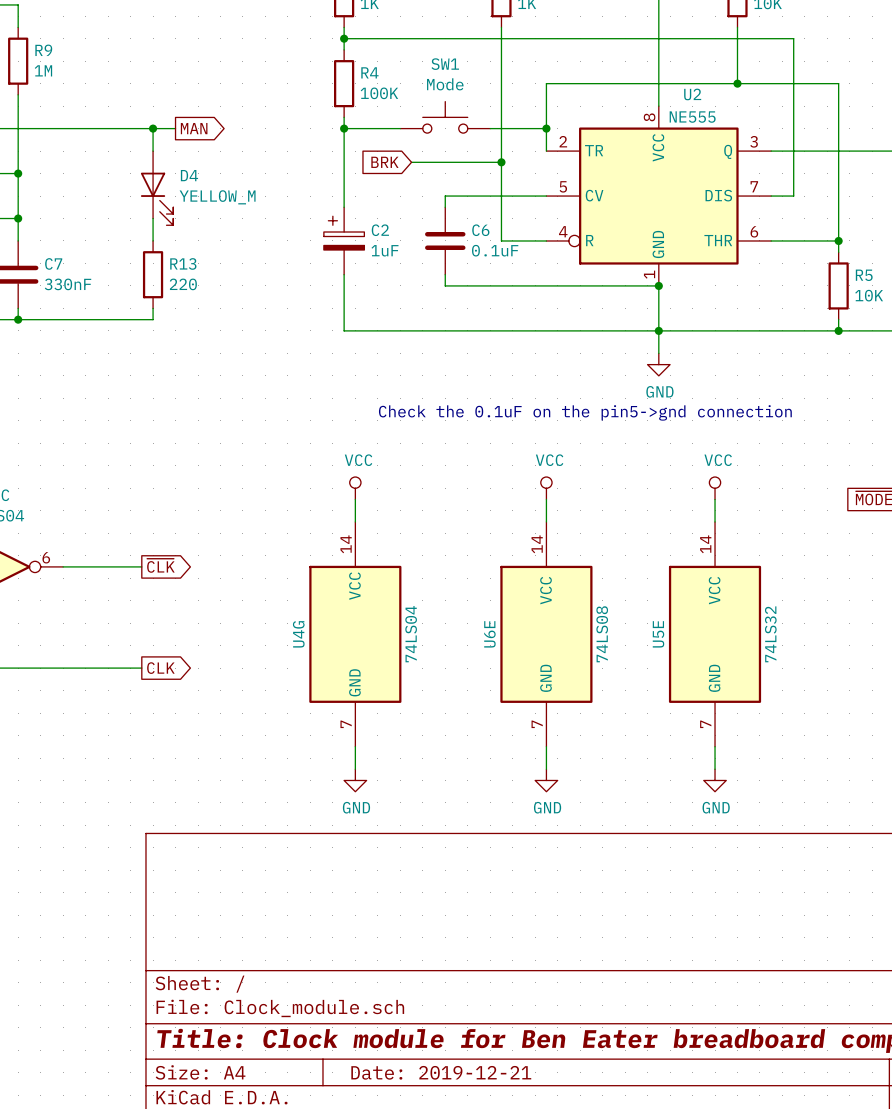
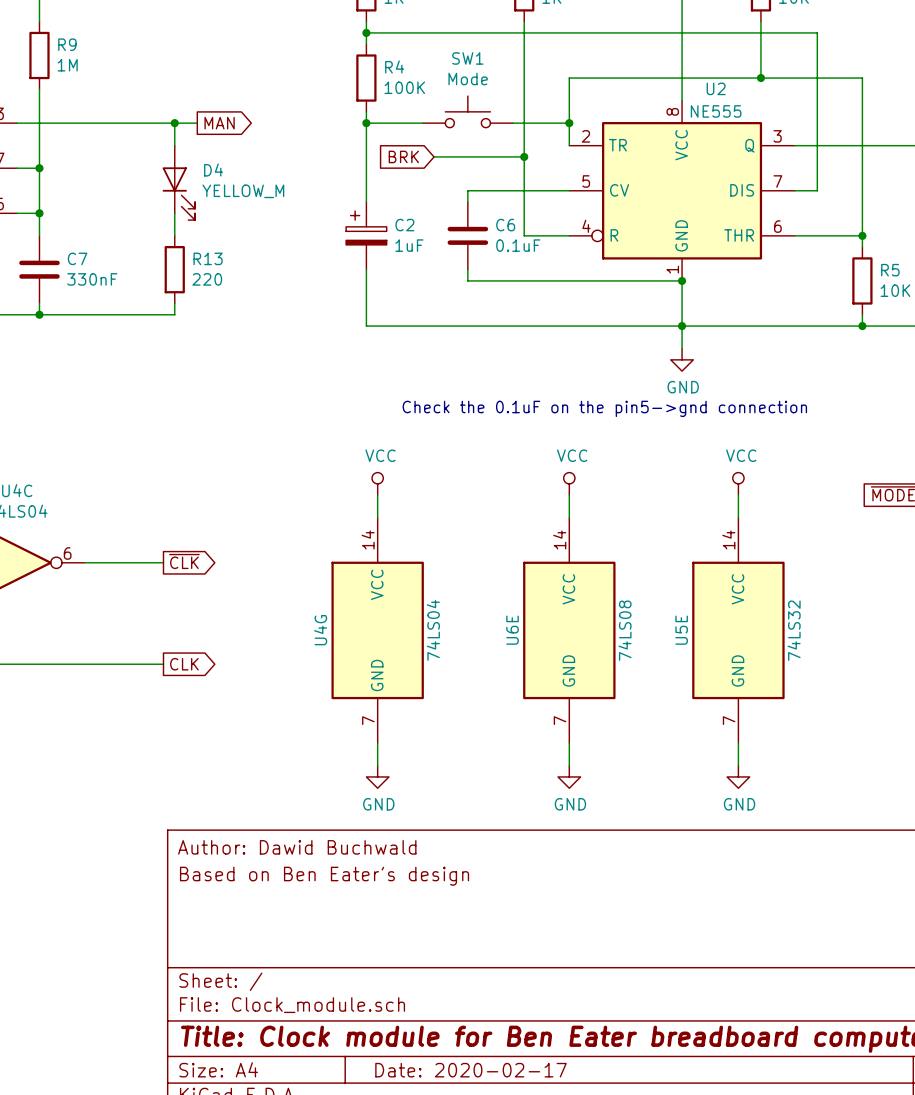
title block: none -> Author: Dawid Buchwald (297, 847)
title block: none -> Based on Ben Eater's design (324, 876)
title block: Date: 2019-12-21 (441, 1072) -> Date: 2020-02-17 (470, 1070)

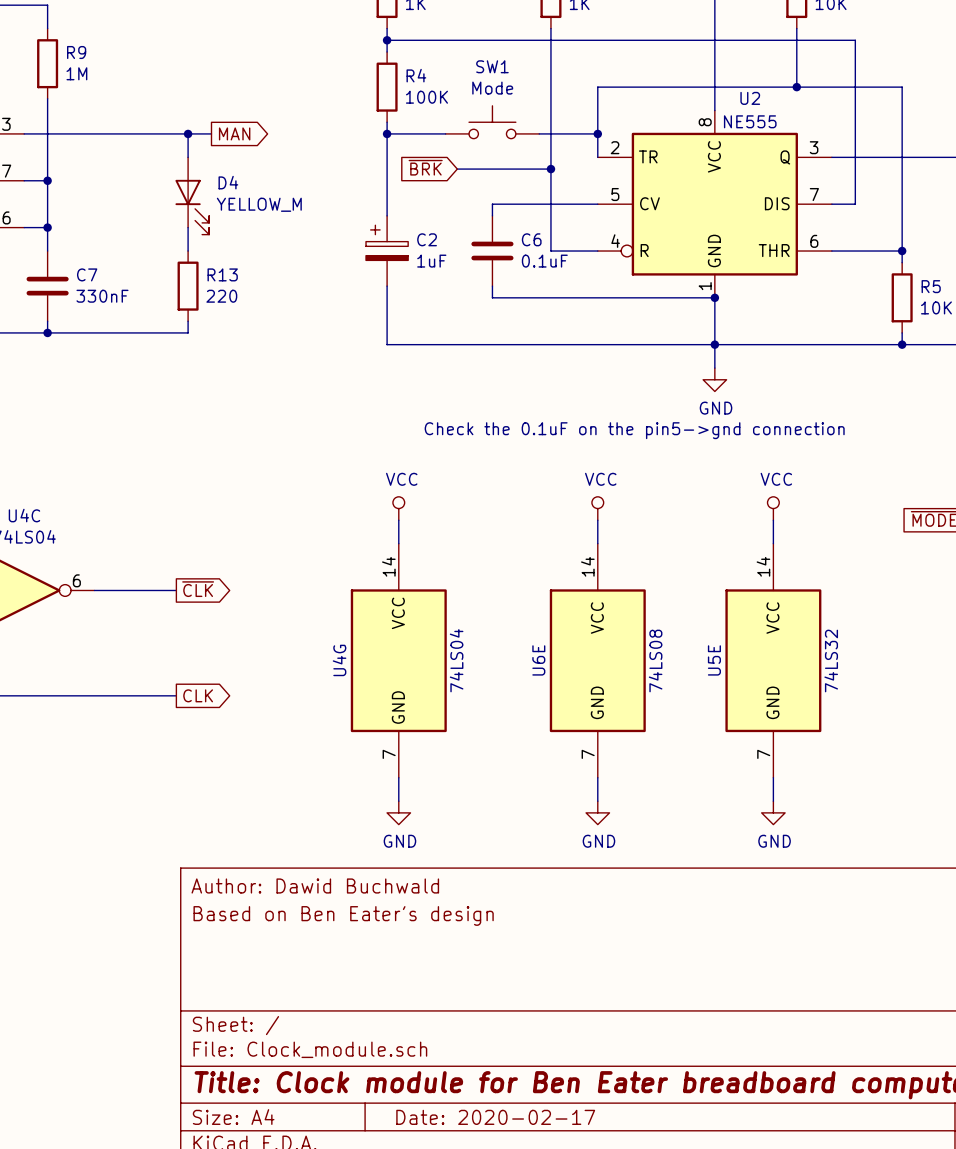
global label: BRK (403, 156) -> ~{BRK} (425, 167)

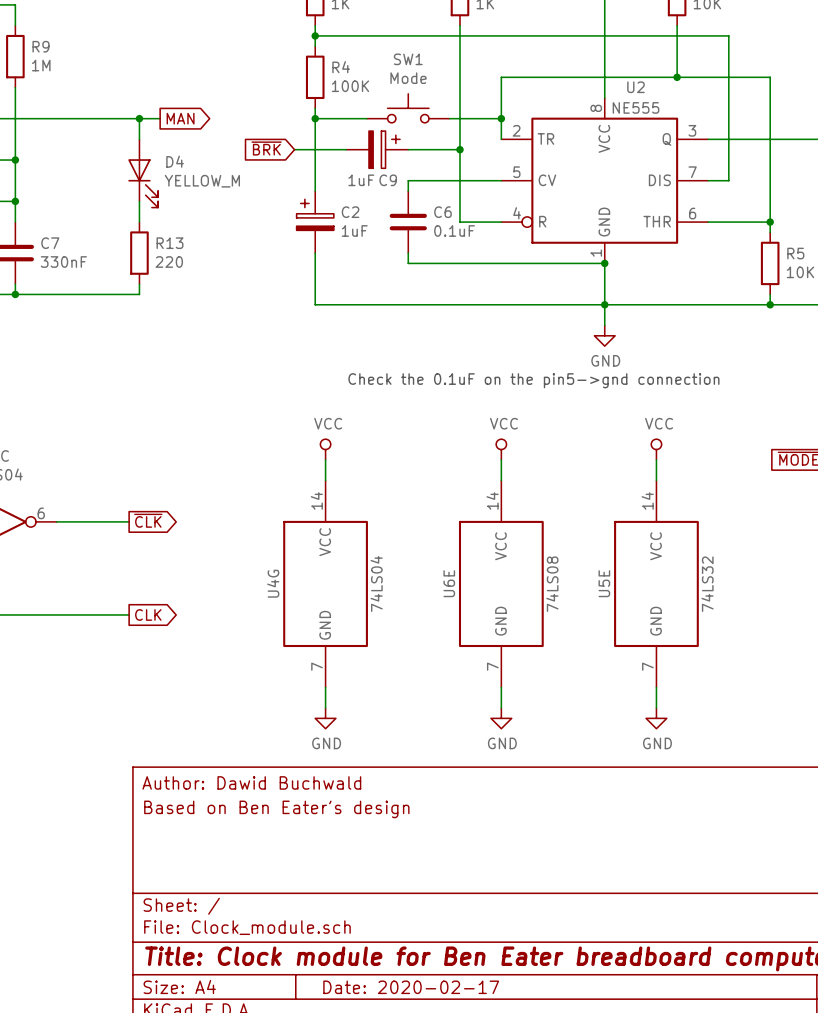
global label position: ~{BRK} (425, 167) -> ~{BRK} (266, 148)
wire: none -> (294, 149) (346, 149)
C9: none -> 1uF (377, 149)

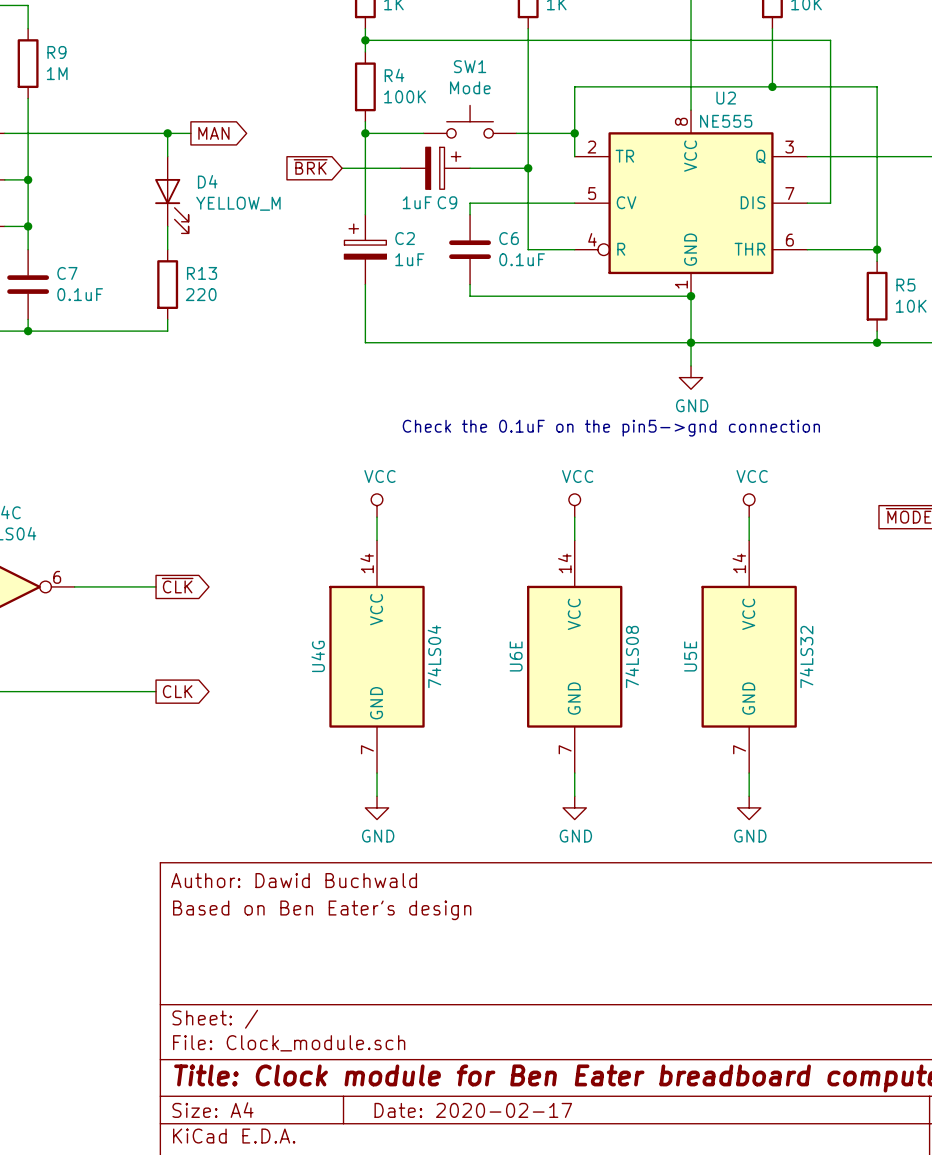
C7 value: 330nF (63, 262) -> 0.1uF (80, 294)

